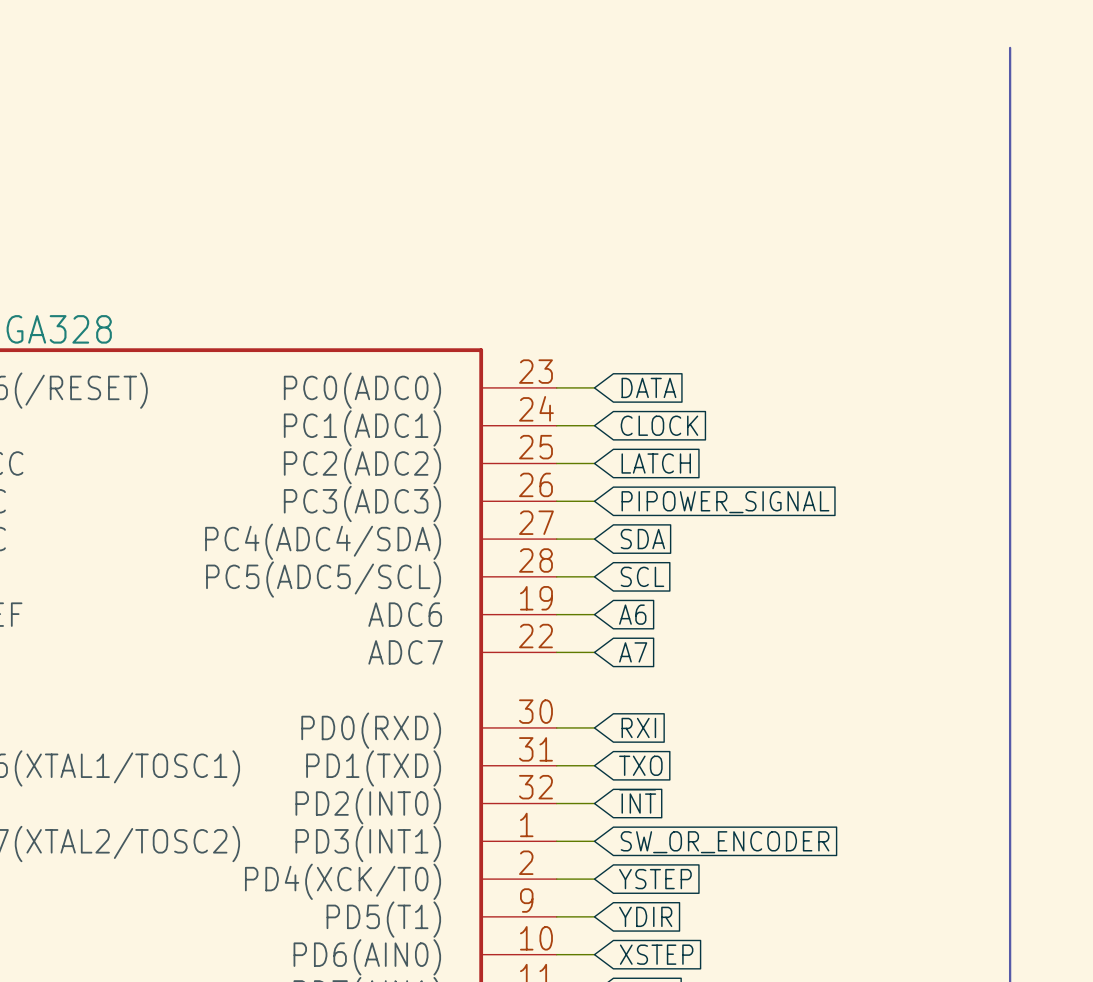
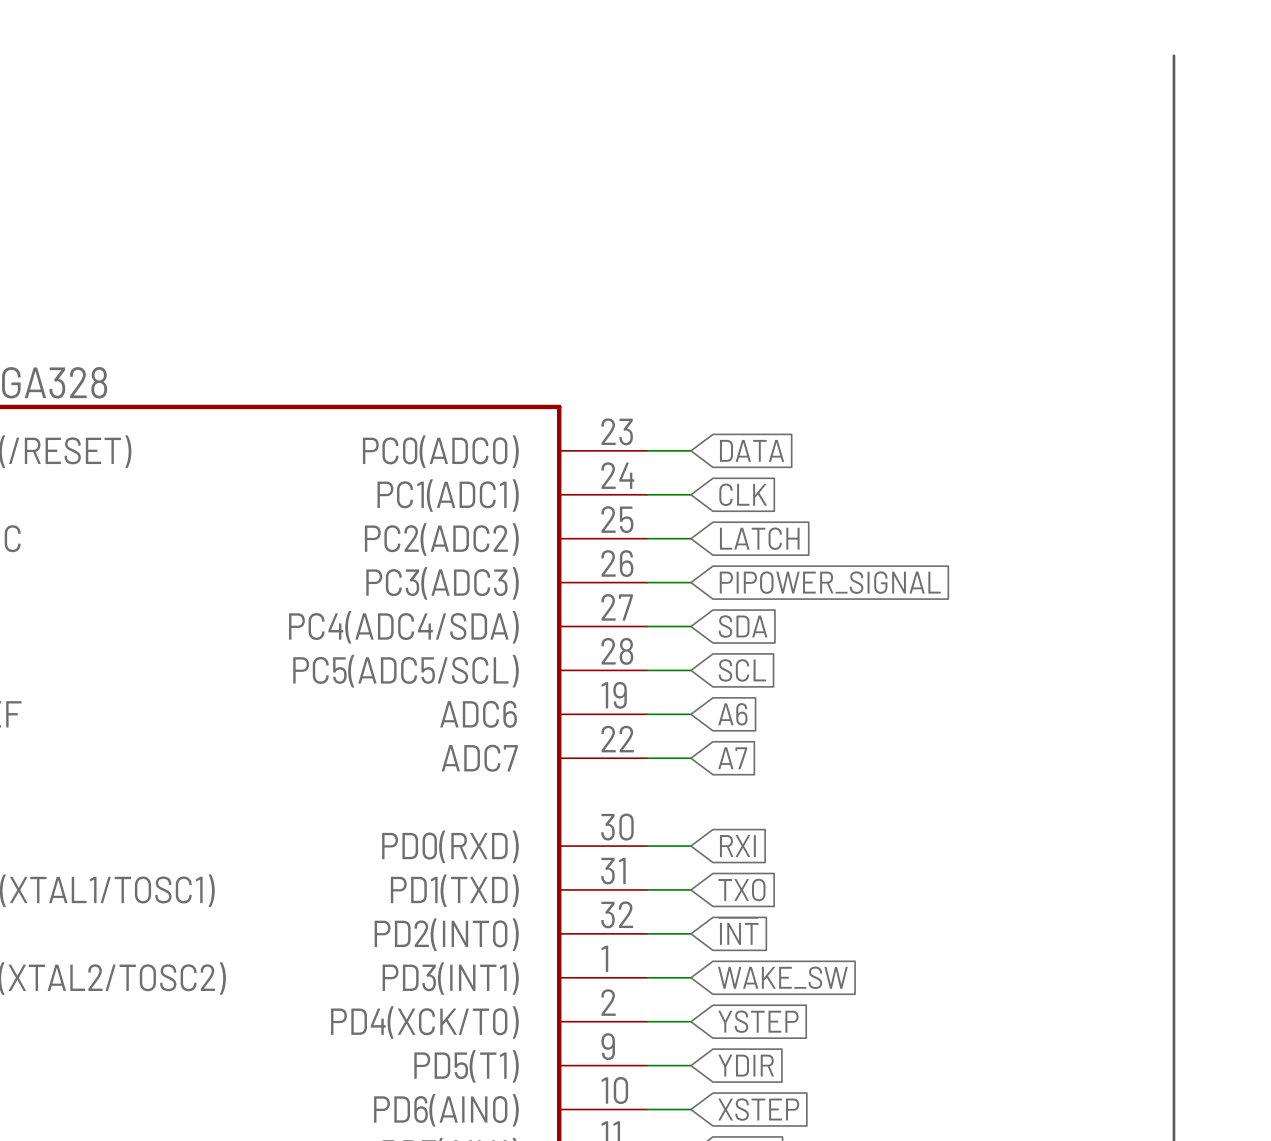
global label: CLOCK (659, 425) -> CLK (743, 494)
global label: SW_OR_ENCODER (725, 842) -> WAKE_SW (782, 977)

